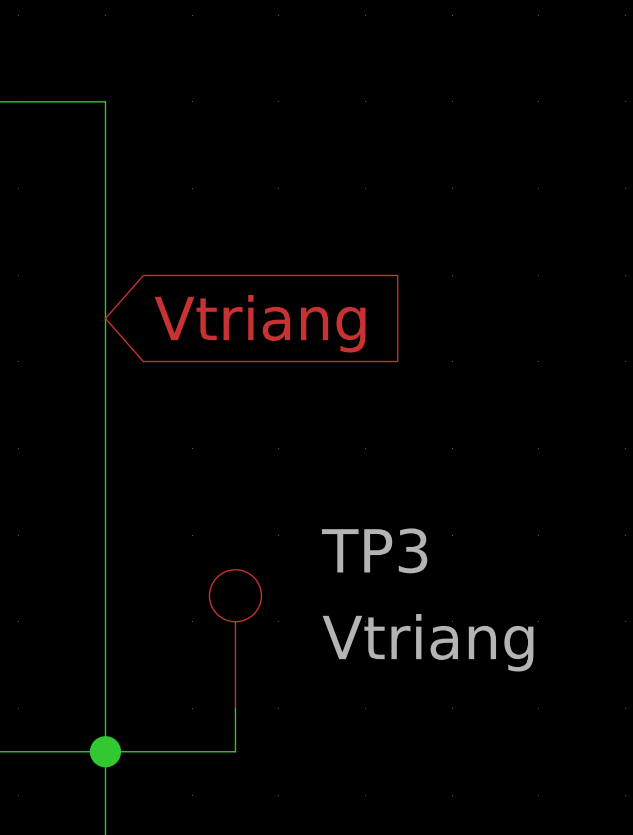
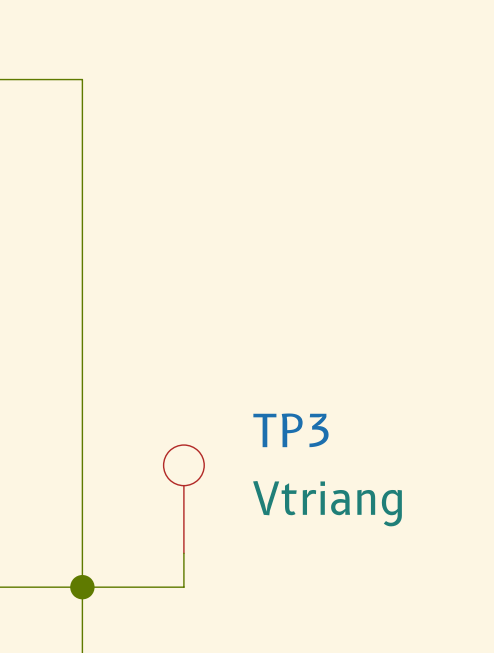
global label: Vtriang (260, 323) -> none

